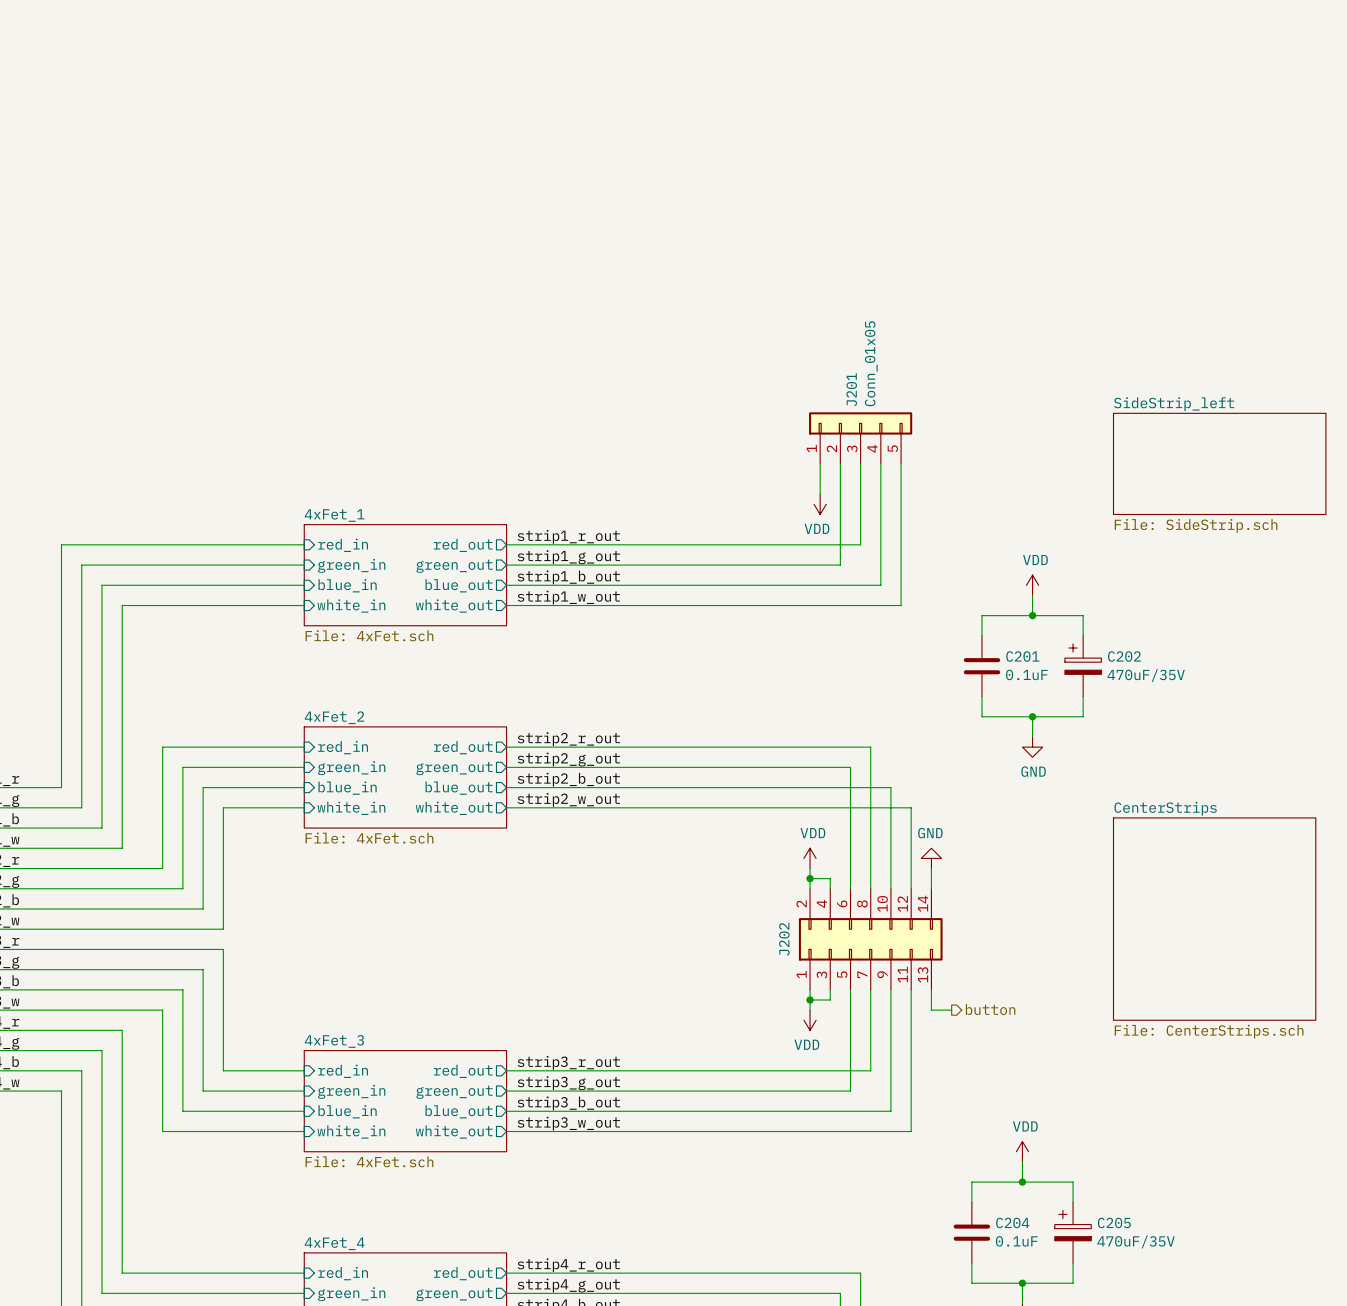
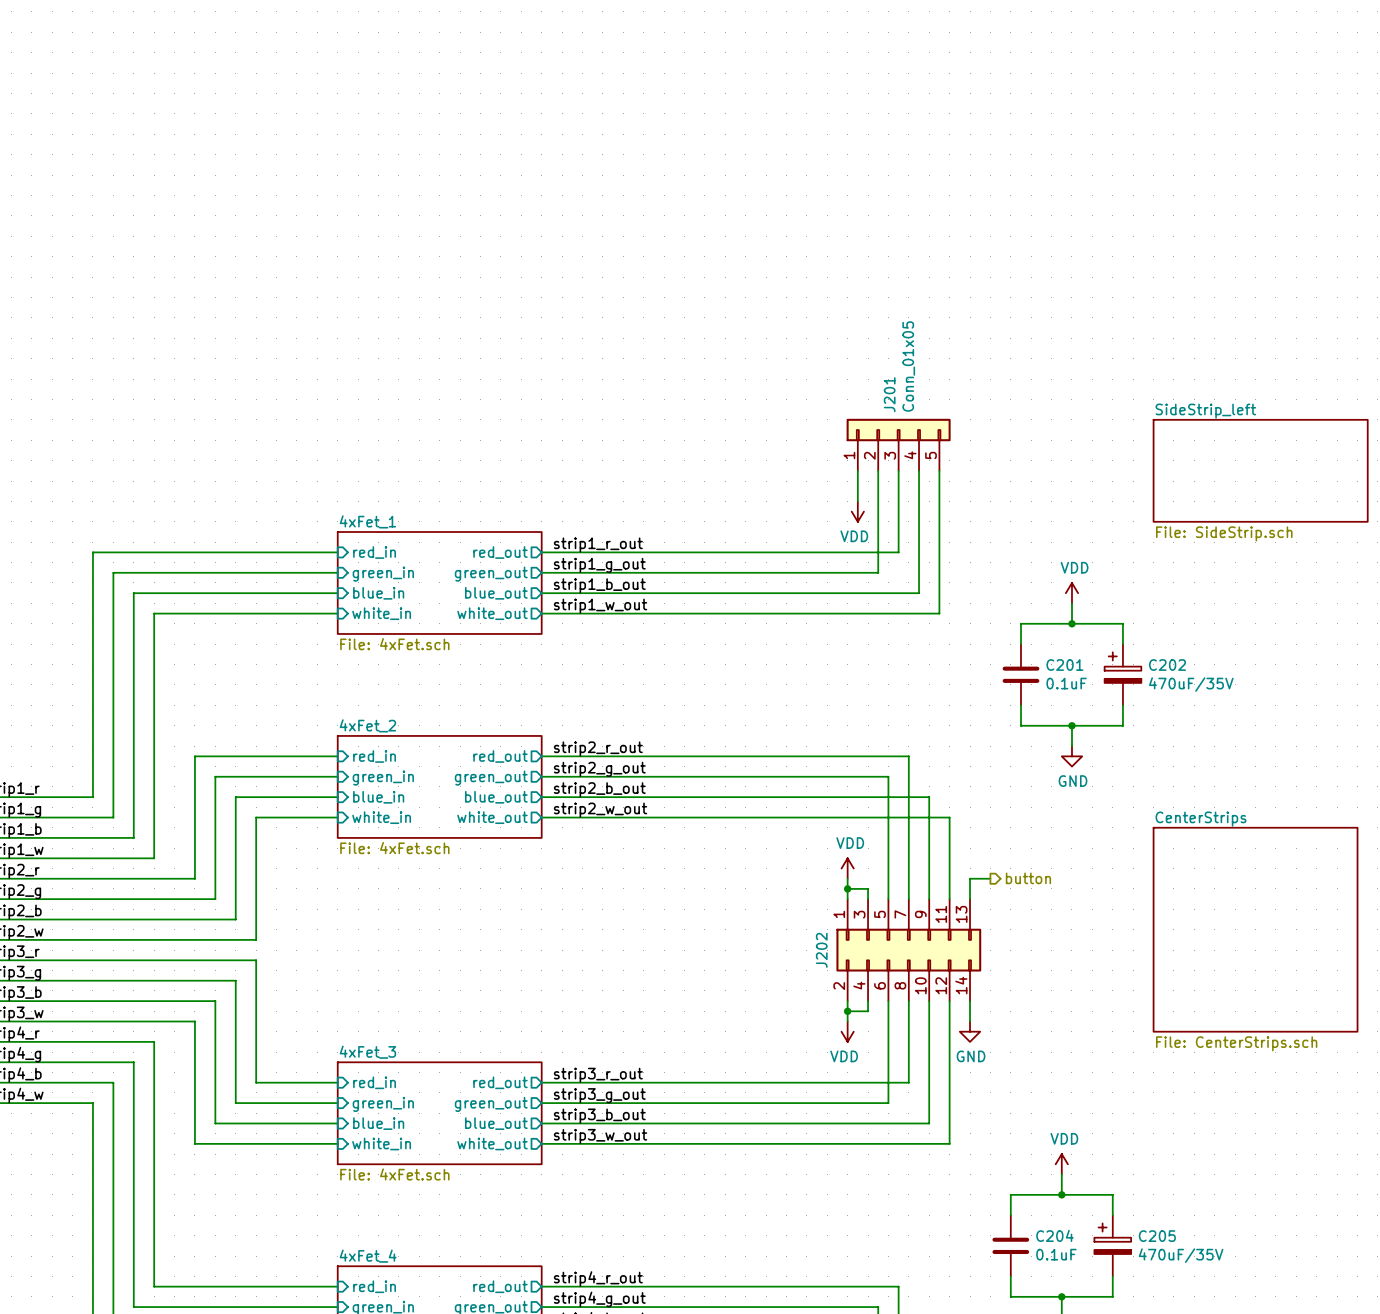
power symbol rotation: 0° (931, 858) -> 180° (970, 1031)
power symbol position: GND (931, 858) -> GND (970, 1031)
J202 flip: as is (870, 939) -> up-down (908, 950)
hierarchical label position: button (990, 1009) -> button (1028, 878)
wire: (931, 1010) (951, 1010) -> (970, 878) (990, 878)

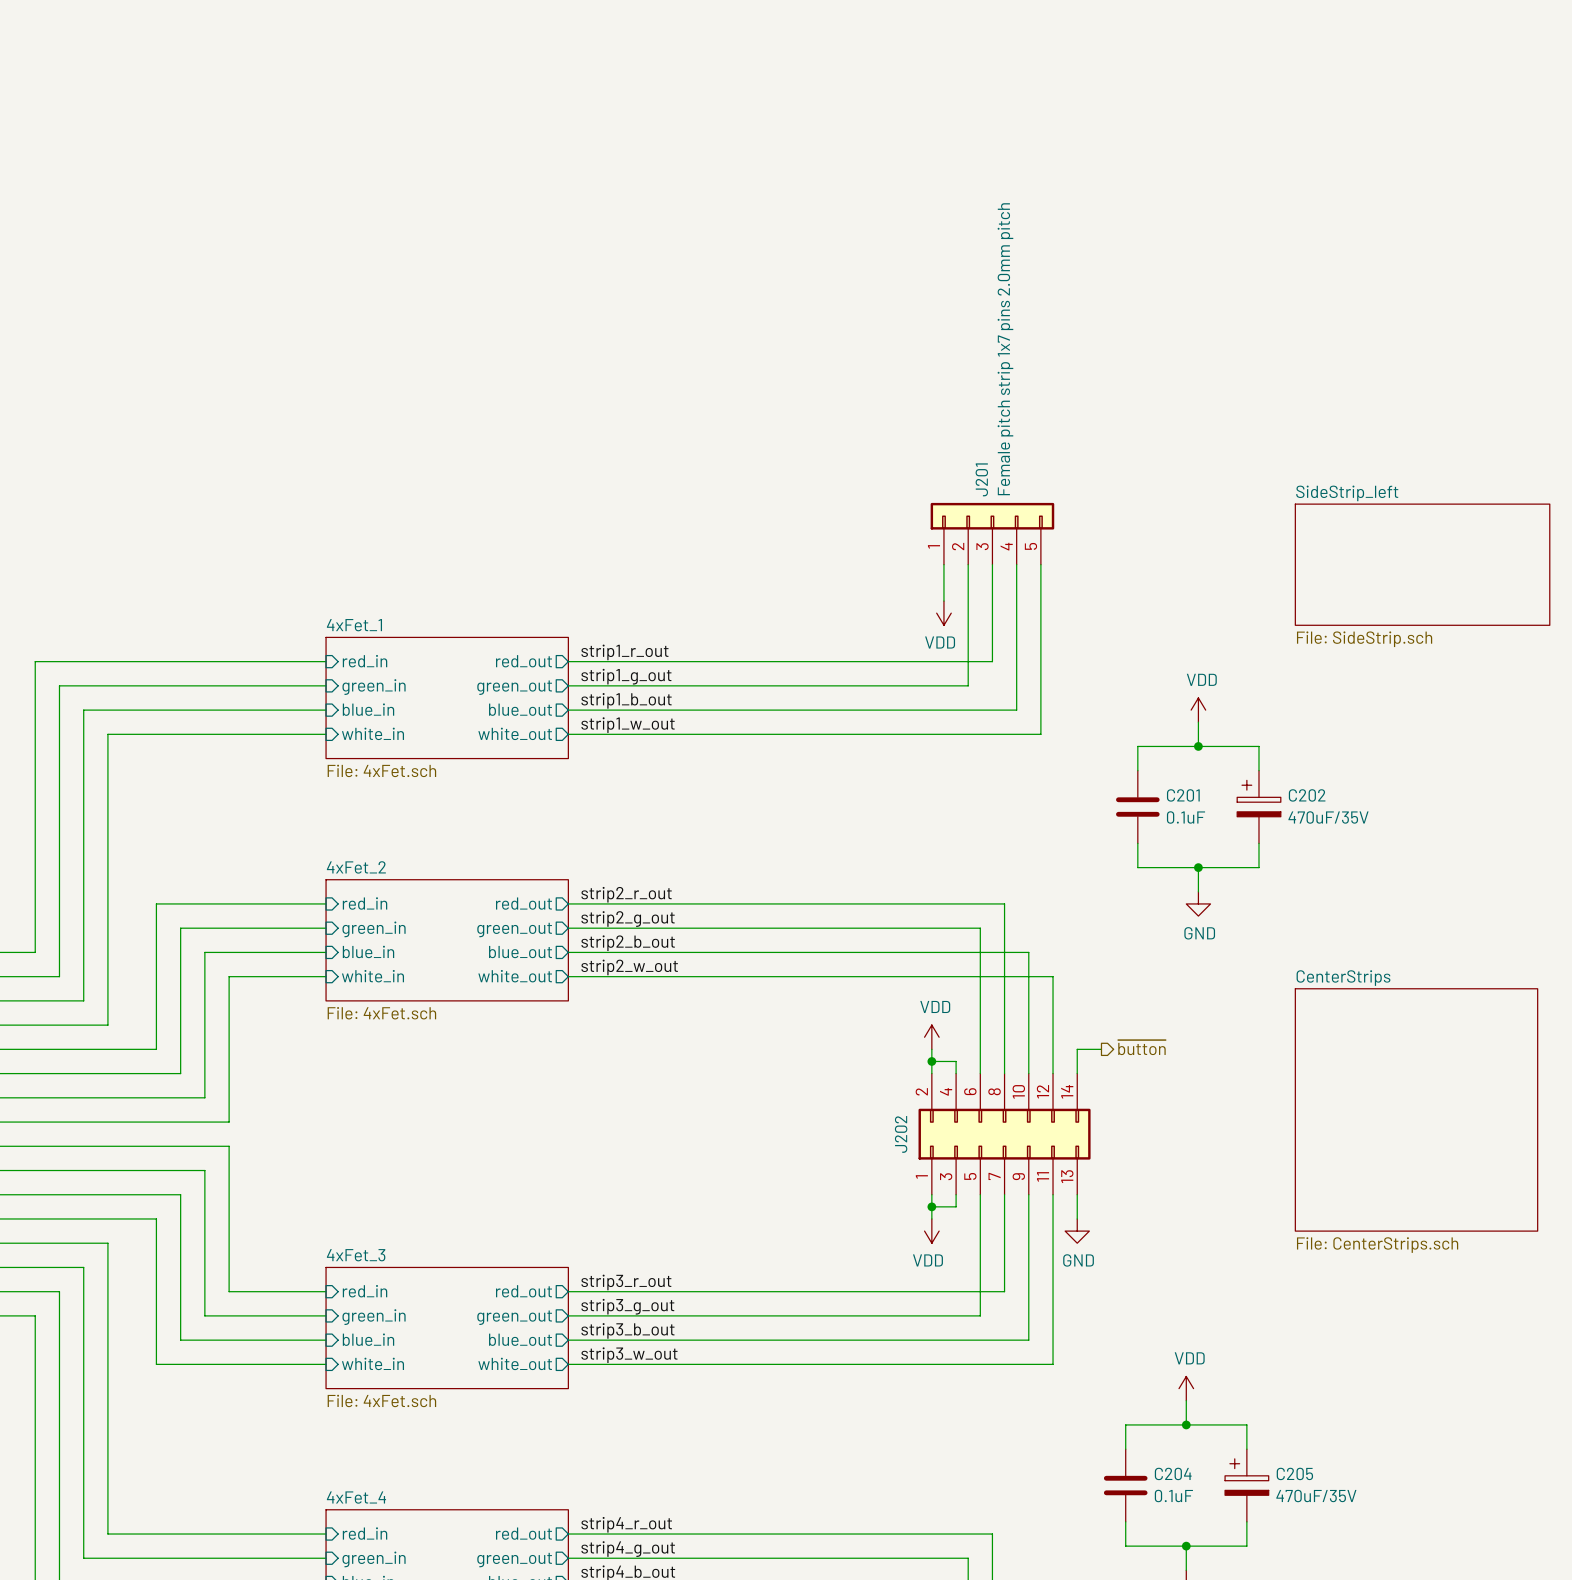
J201 value: Conn_01x05 (908, 366) -> Female pitch strip 1x7 pins 2.0mm pitch (1005, 349)
hierarchical label: button (1028, 878) -> ~{button} (1141, 1047)
J202 flip: as is (908, 950) -> up-down (1004, 1134)

